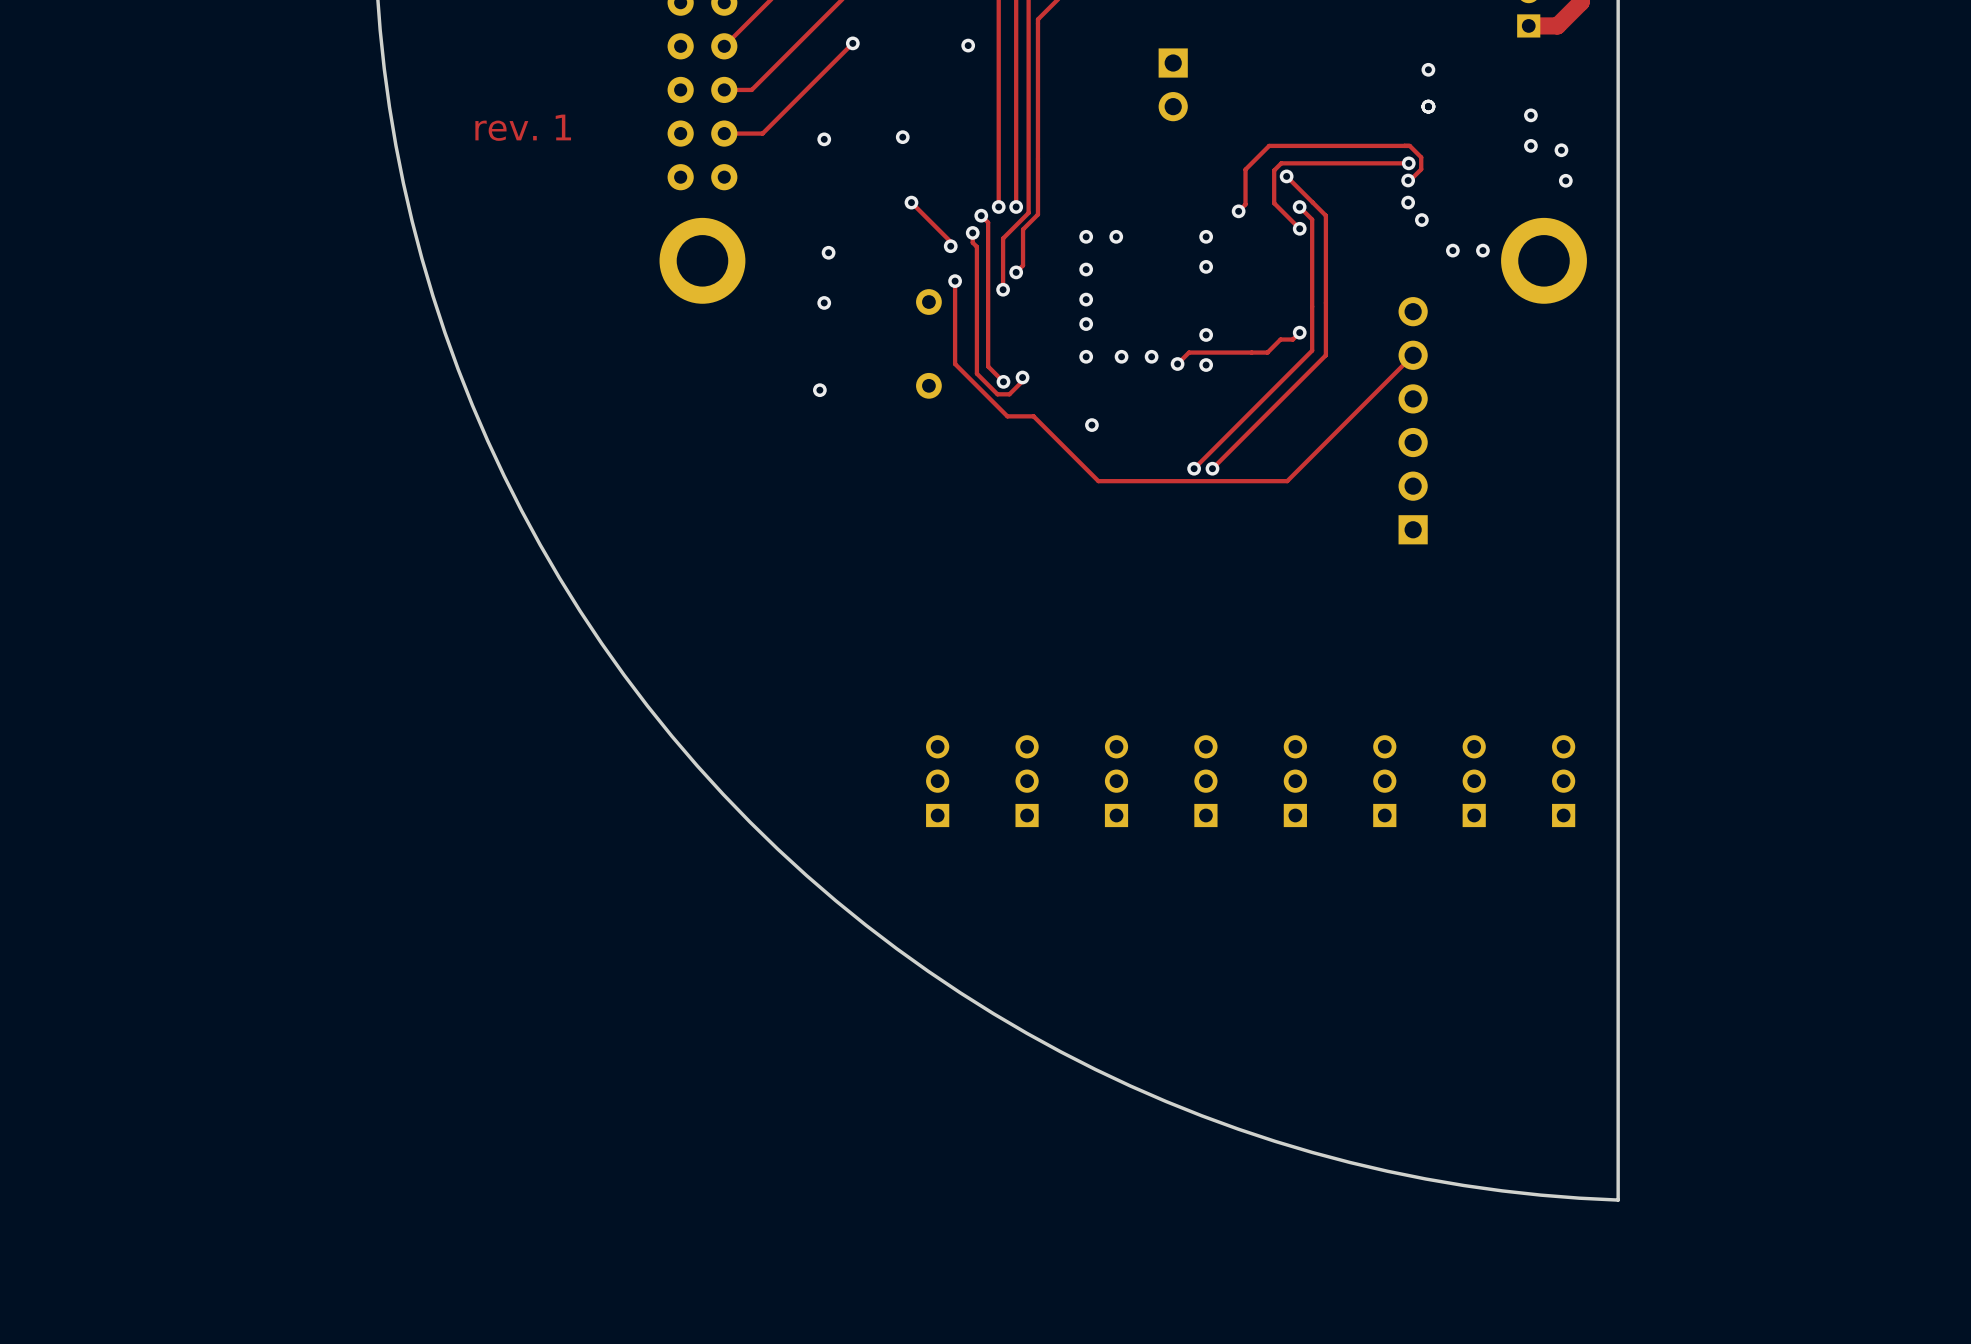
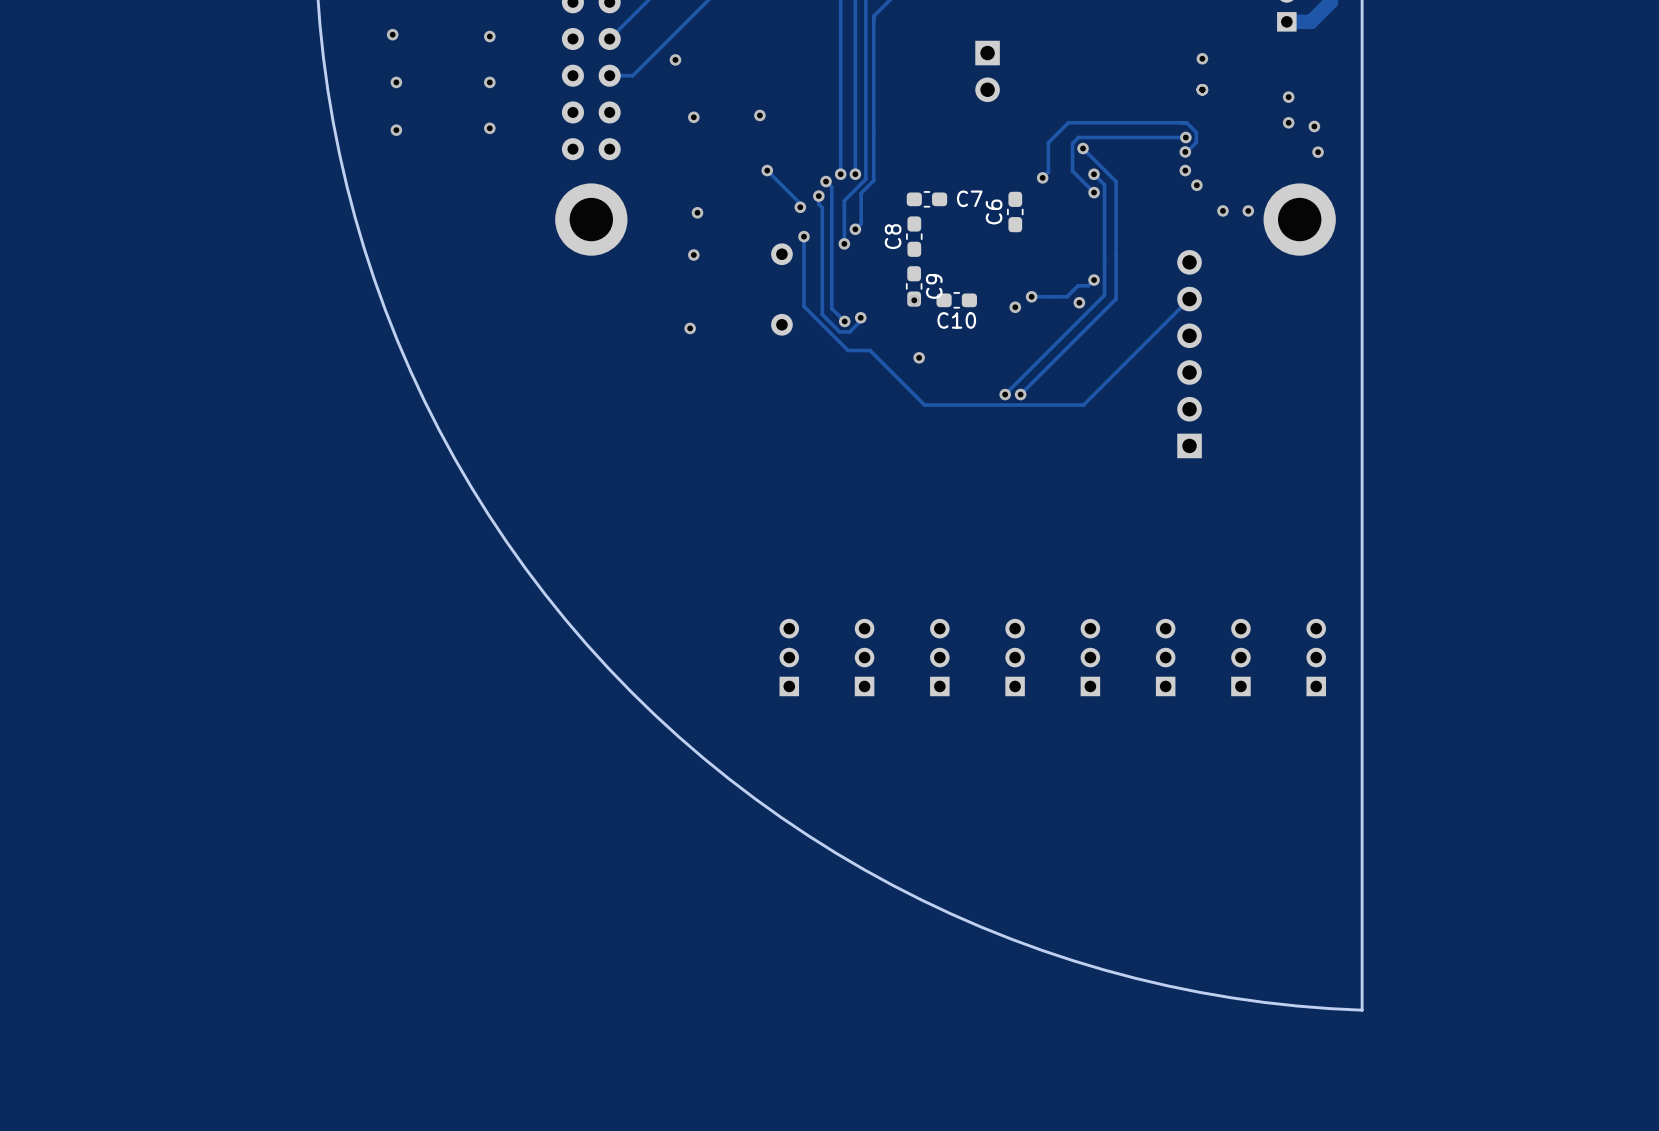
via: none -> (392, 34)
via: none -> (489, 36)
track: (852, 43) (762, 133) (724, 133) -> none
via: (852, 43) -> none
via: (968, 45) -> none
via: none -> (675, 59)
via: none -> (396, 82)
via: none -> (489, 82)
text: rev. 1 (523, 127) -> none
via: none -> (489, 128)
via: none -> (396, 130)
via: (1086, 236) -> none
C7: none -> (926, 199)
via: (1116, 236) -> none
via: (1206, 236) -> none
C6: none -> (1015, 211)
via: (1206, 266) -> none
via: (1086, 269) -> none
C8: none -> (914, 236)
via: (1086, 299) -> none
via: (1086, 324) -> none
via: (1206, 334) -> none
C9: none -> (914, 286)
track: (1225, 352) (1189, 352) (1177, 364) -> none
via: none -> (1031, 296)
via: (1121, 356) -> none
C10: none -> (956, 300)
via: (1151, 356) -> none
via: none -> (1079, 302)
via: (1177, 364) -> none

